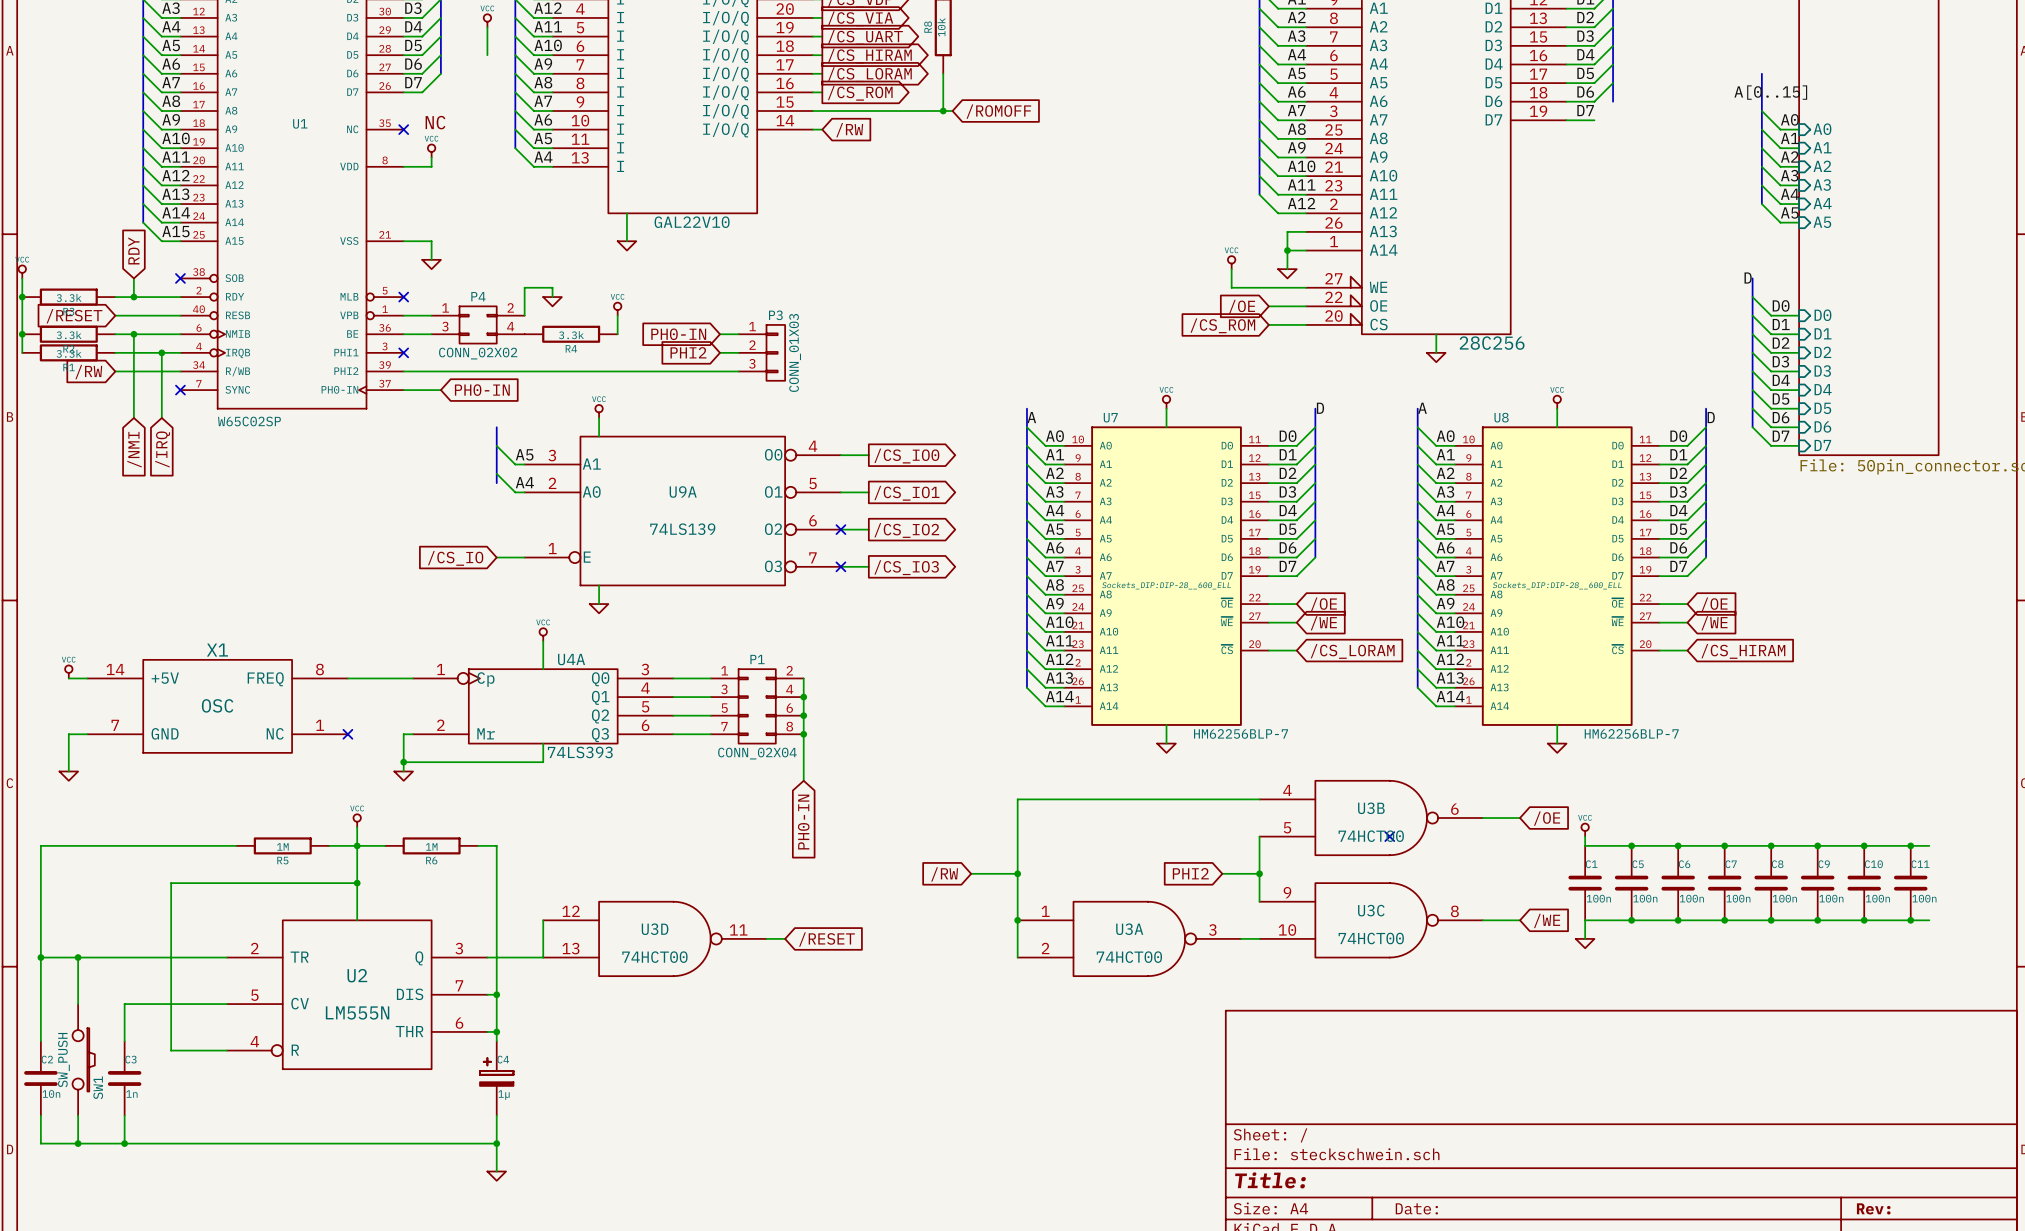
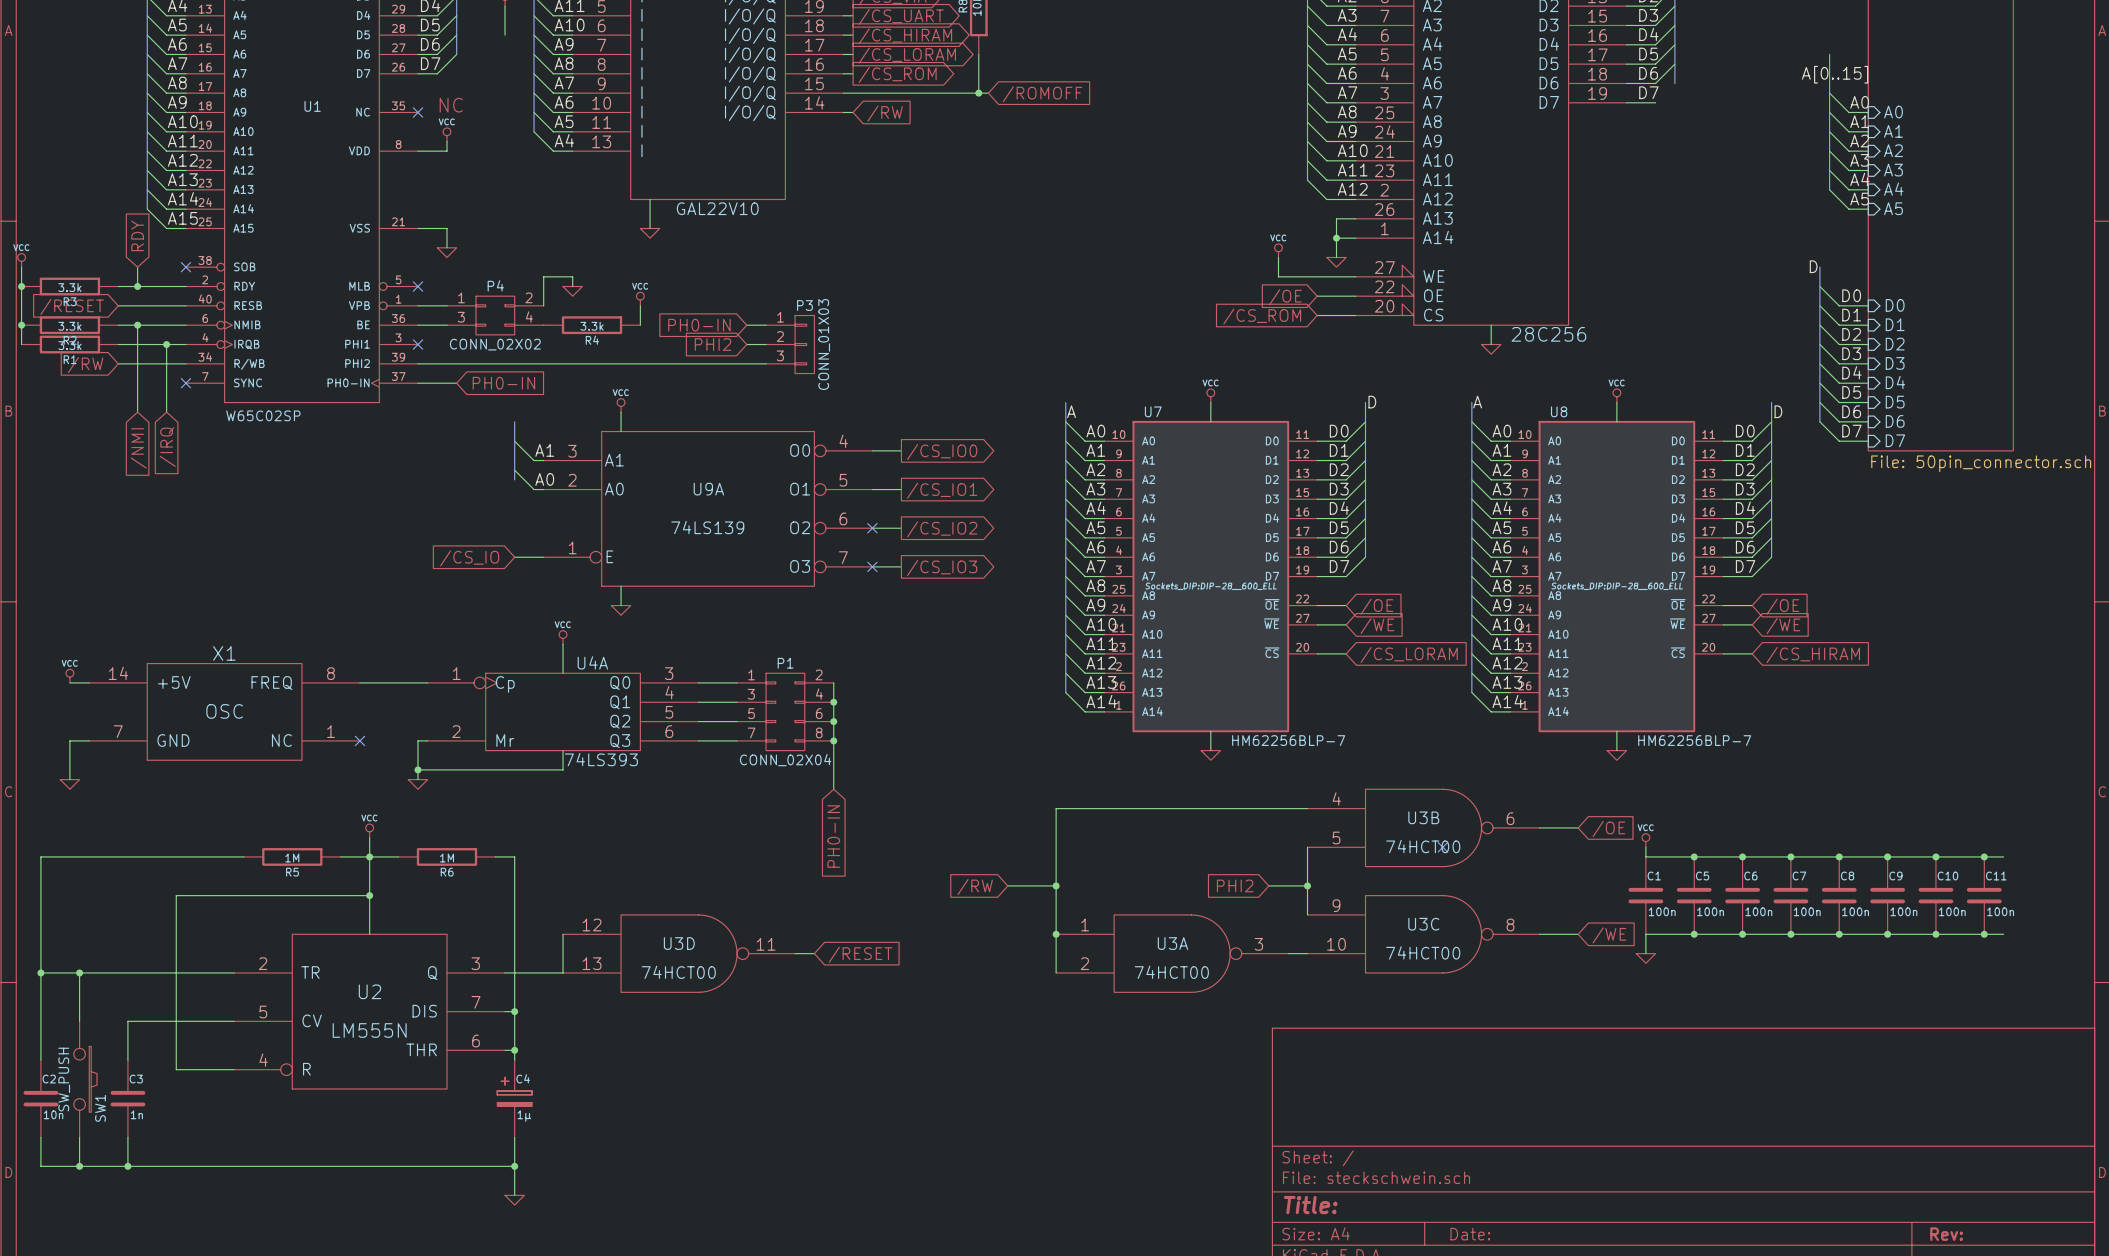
label: A5 (524, 454) -> A1 (544, 450)
label: A4 (524, 482) -> A0 (544, 479)

